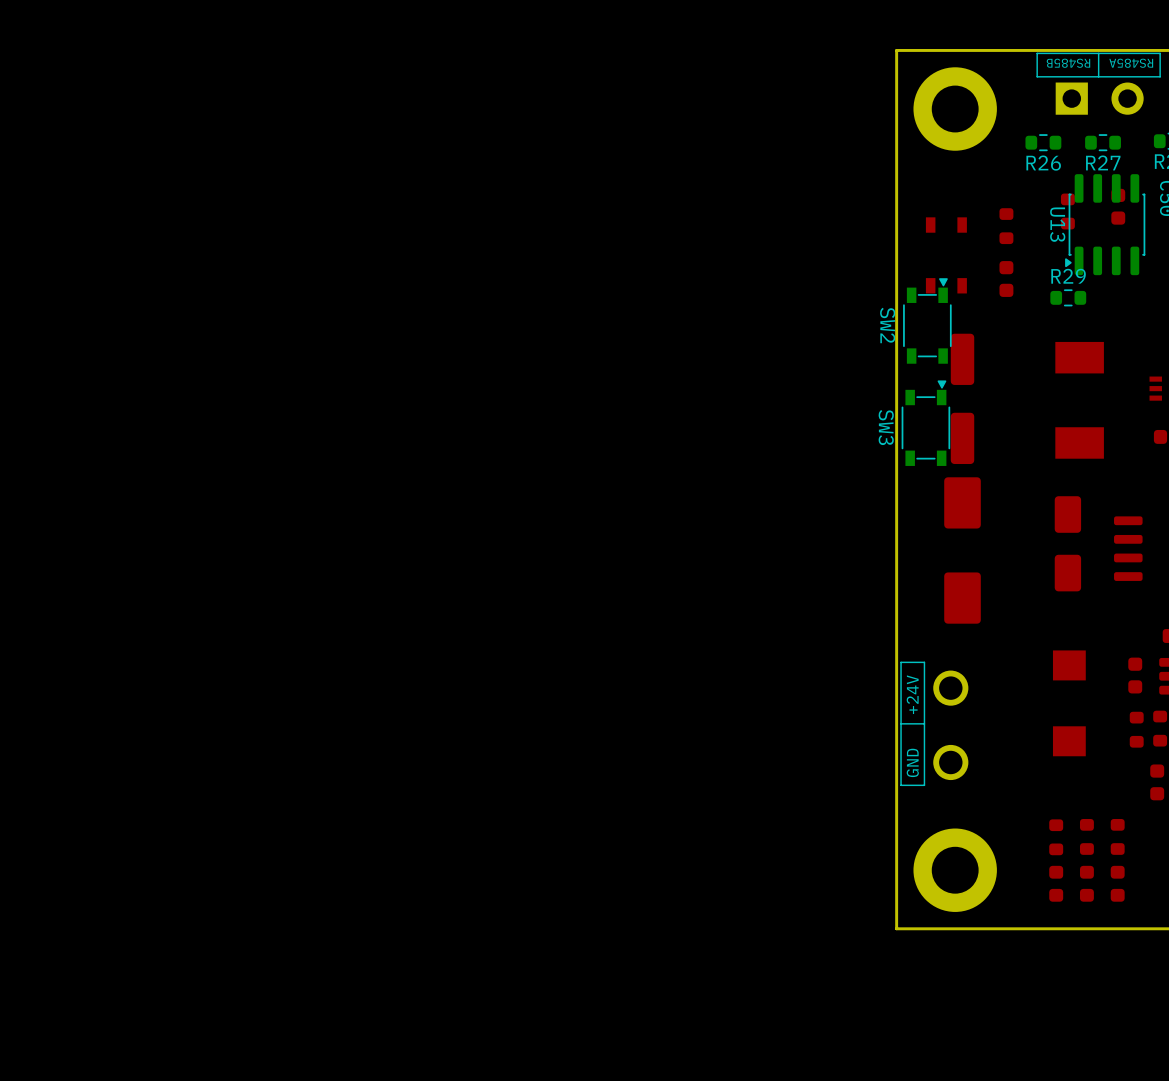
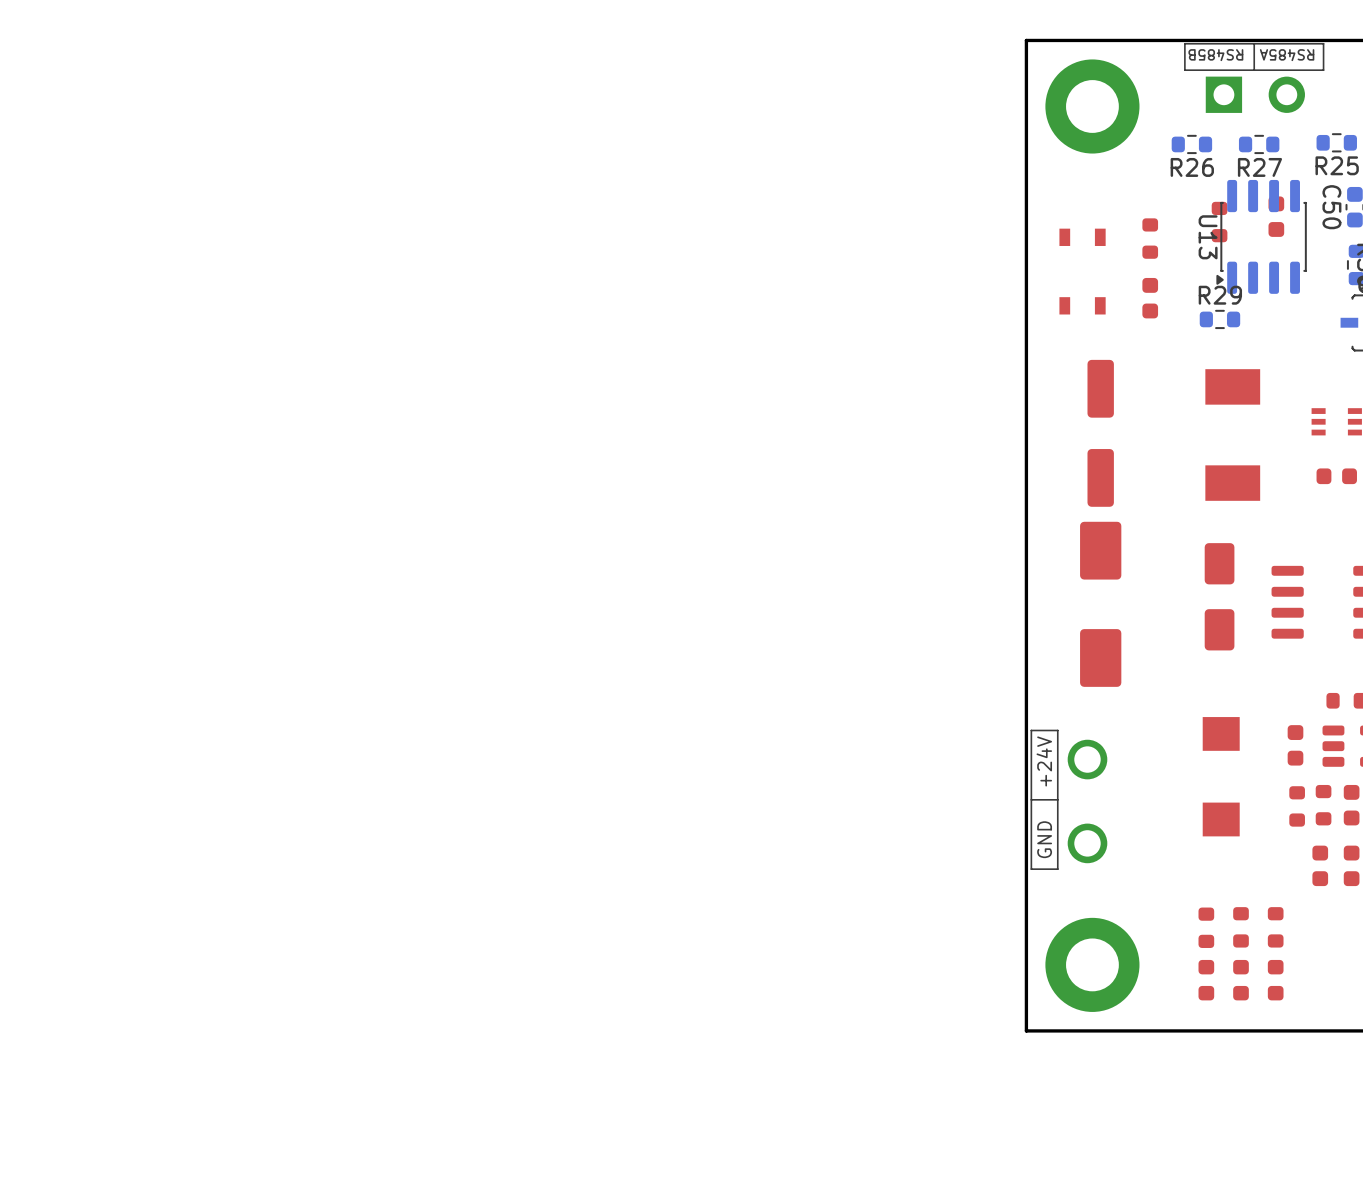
SW2: (927, 320) -> none
SW3: (925, 423) -> none

